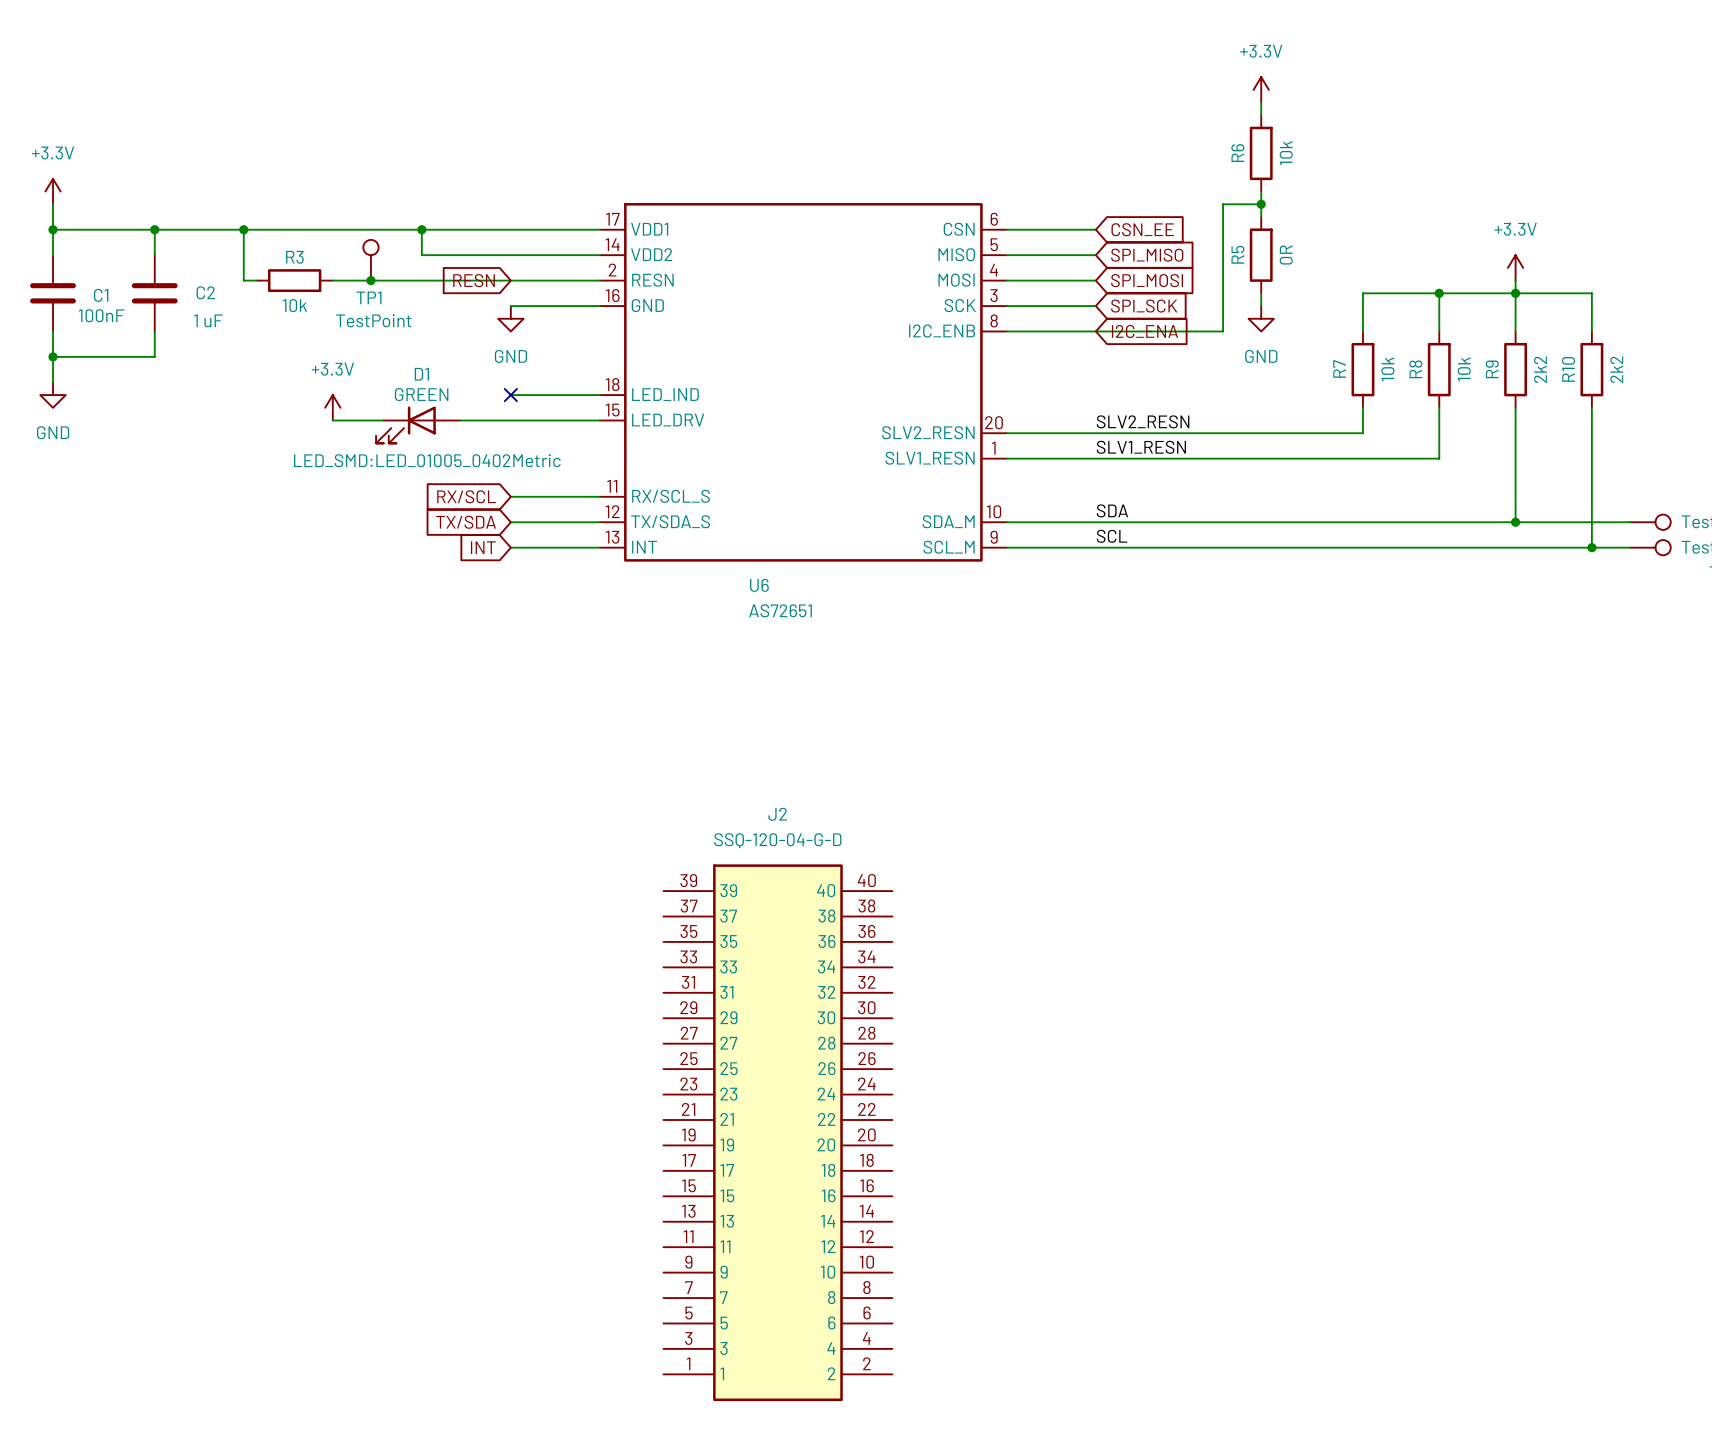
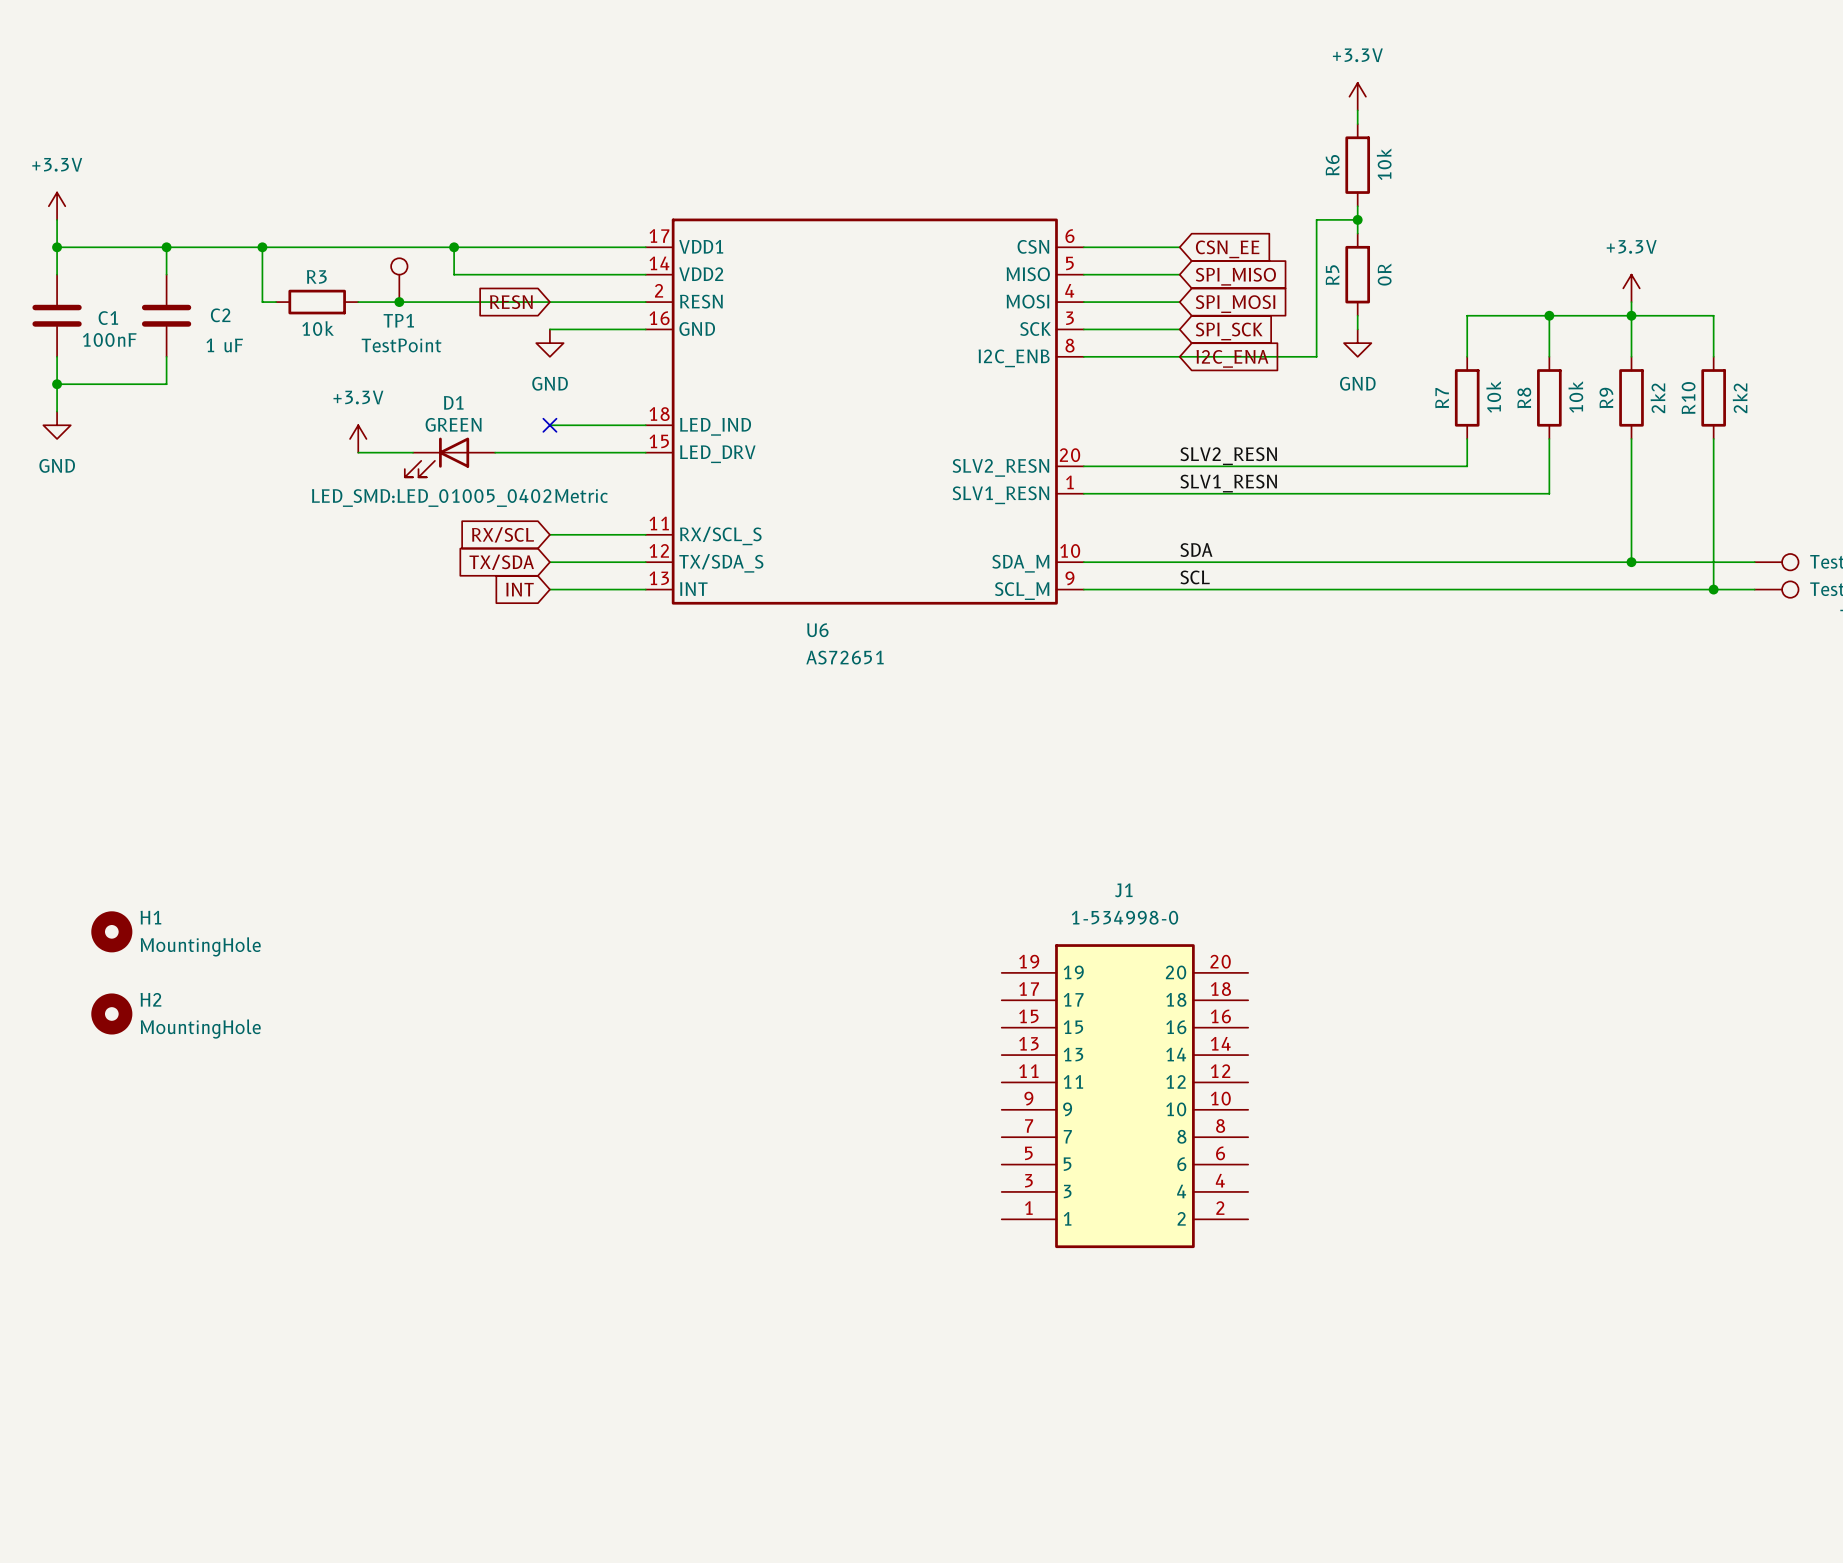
H1: none -> MountingHole (111, 931)
H2: none -> MountingHole (111, 1013)
J1: none -> 1-534998-0 (1124, 1096)
J2: SSQ-120-04-G-D (777, 1132) -> none

